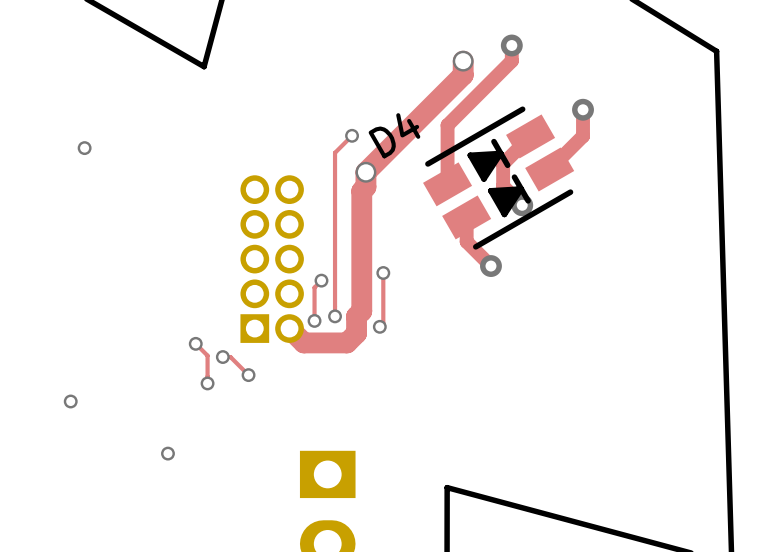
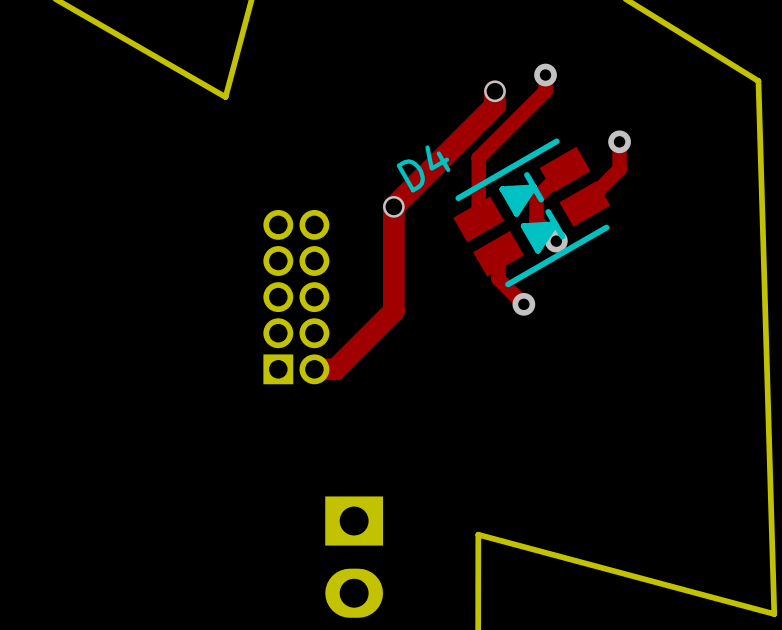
track: (352, 135) (335, 152) (335, 316) -> none
via: (352, 135) -> none
via: (84, 148) -> none
track: (365, 187) (361, 191) (361, 311) (356, 316) (356, 333) (346, 342) (303, 342) (289, 328) -> (393, 222) (393, 311) (335, 369) (314, 369)
track: (383, 272) (383, 323) (379, 326) -> none
via: (383, 272) -> none
track: (321, 280) (314, 287) (314, 320) -> none
via: (321, 280) -> none
via: (335, 316) -> none
via: (314, 320) -> none
via: (379, 326) -> none
track: (195, 343) (207, 355) (207, 383) -> none
via: (195, 343) -> none
track: (222, 357) (230, 357) (248, 375) -> none
via: (222, 357) -> none
via: (248, 375) -> none
via: (207, 383) -> none
via: (70, 401) -> none
via: (167, 453) -> none

